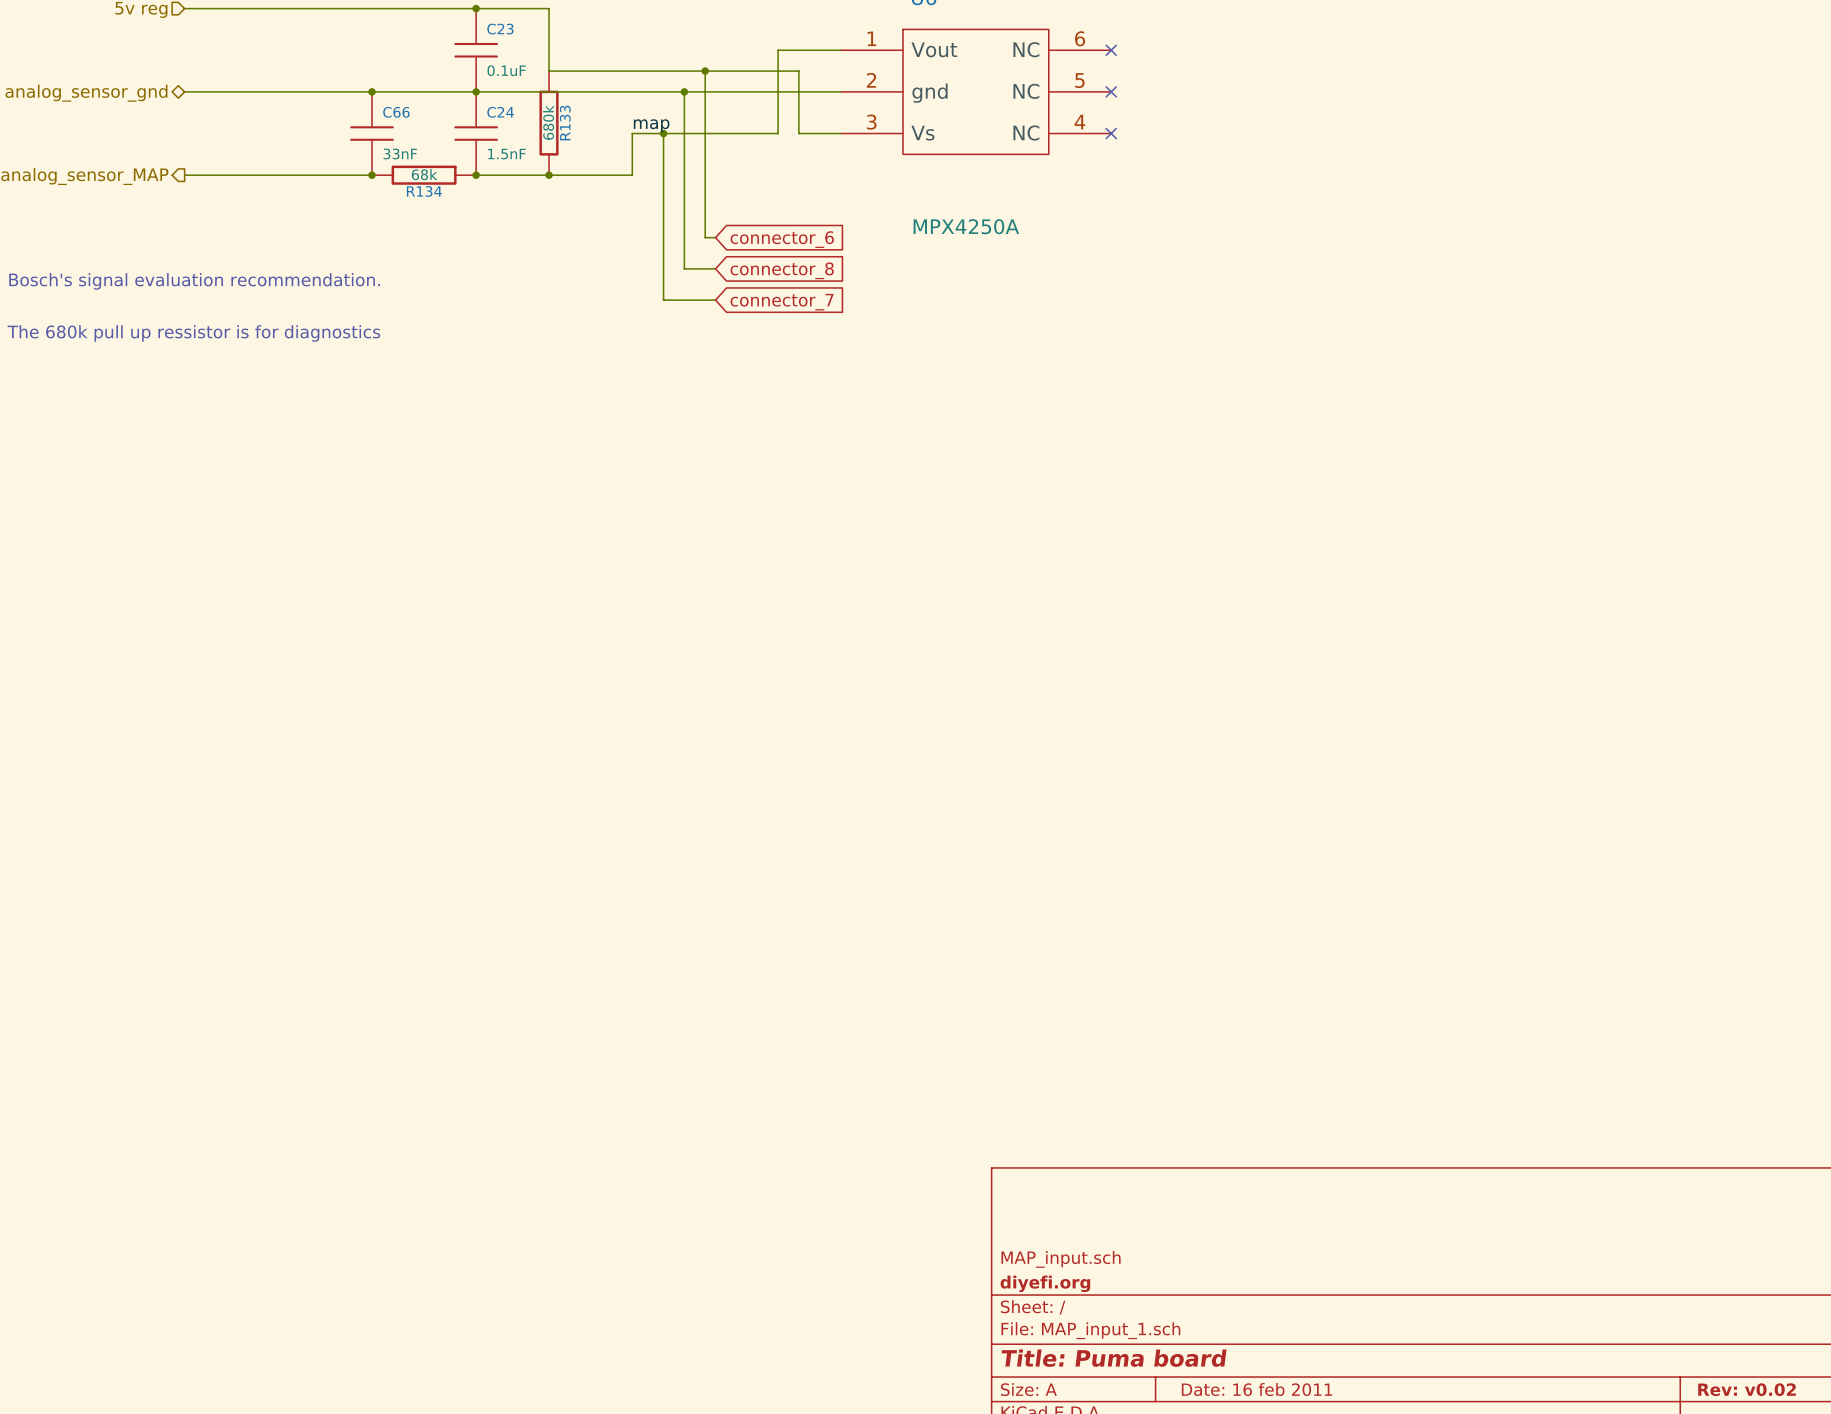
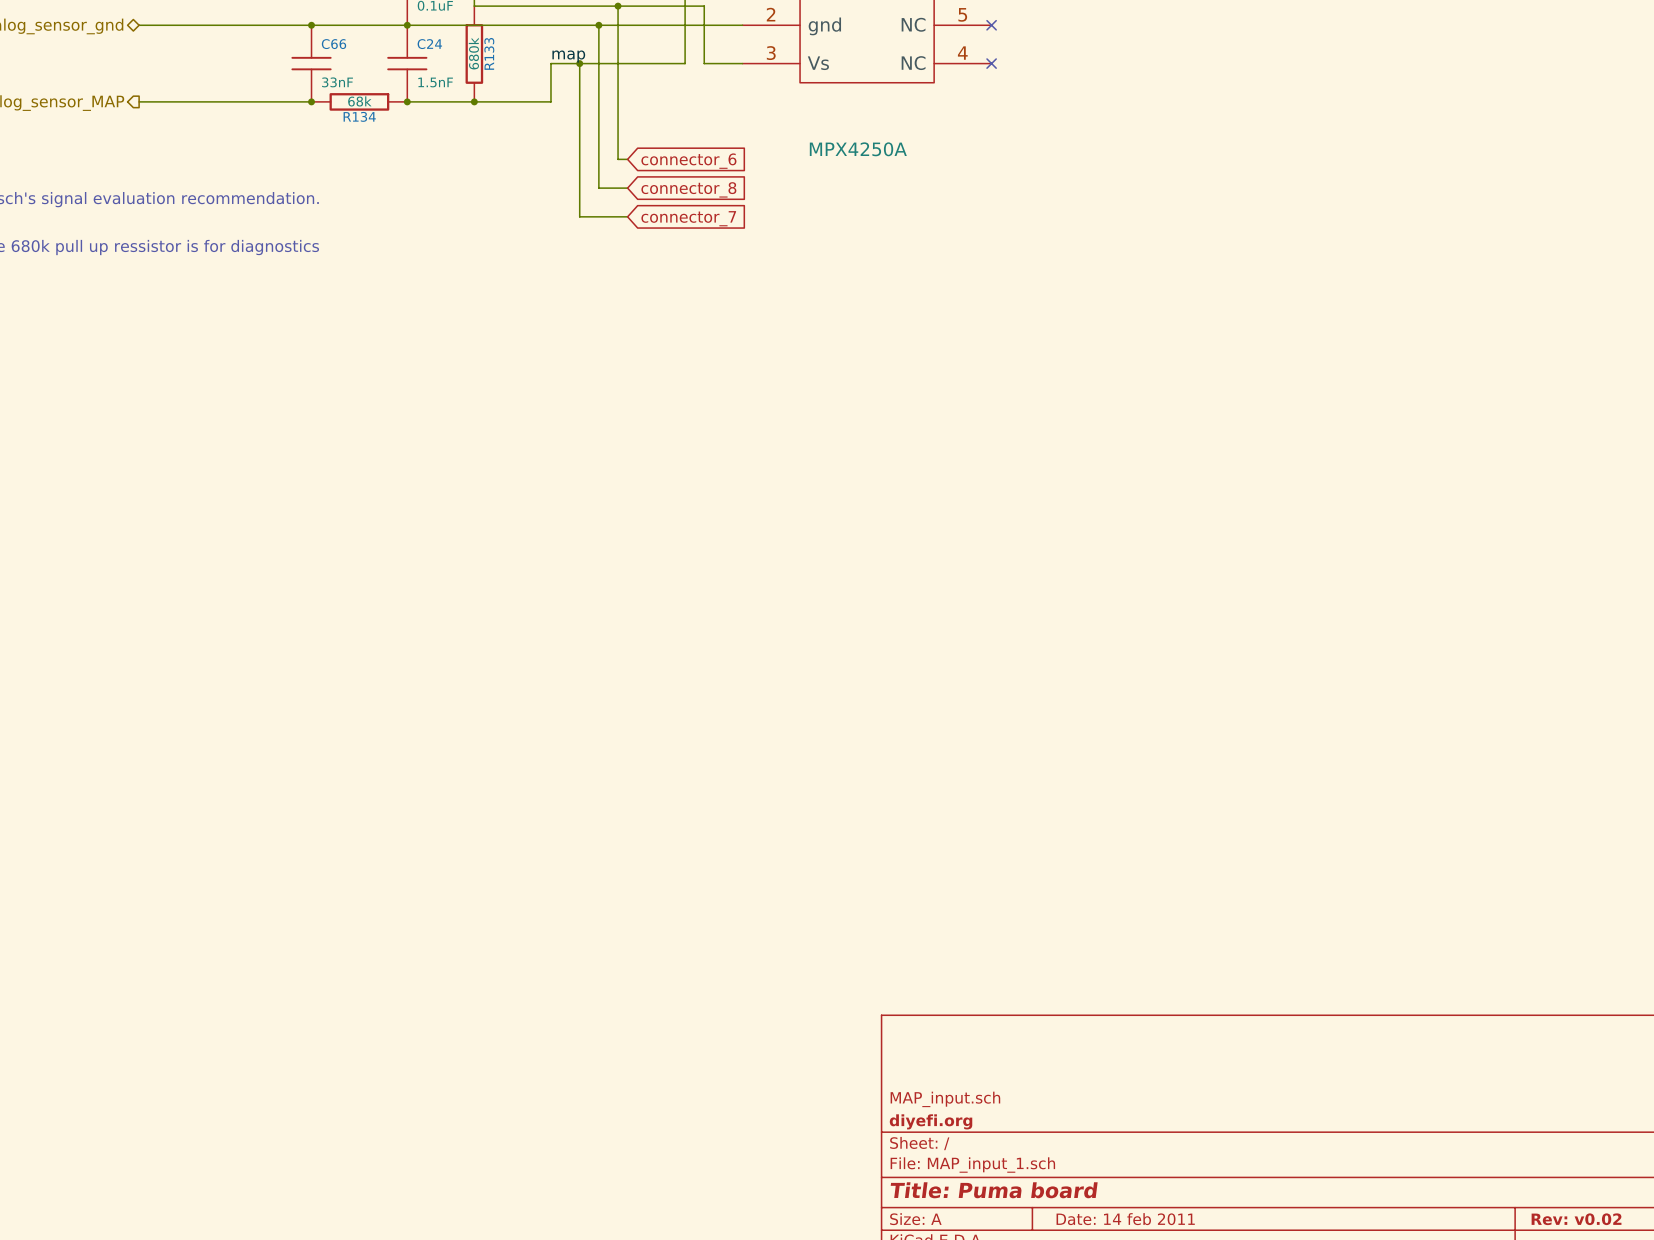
title block: Date: 16 feb 2011 (1256, 1389) -> Date: 14 feb 2011 (1125, 1219)

